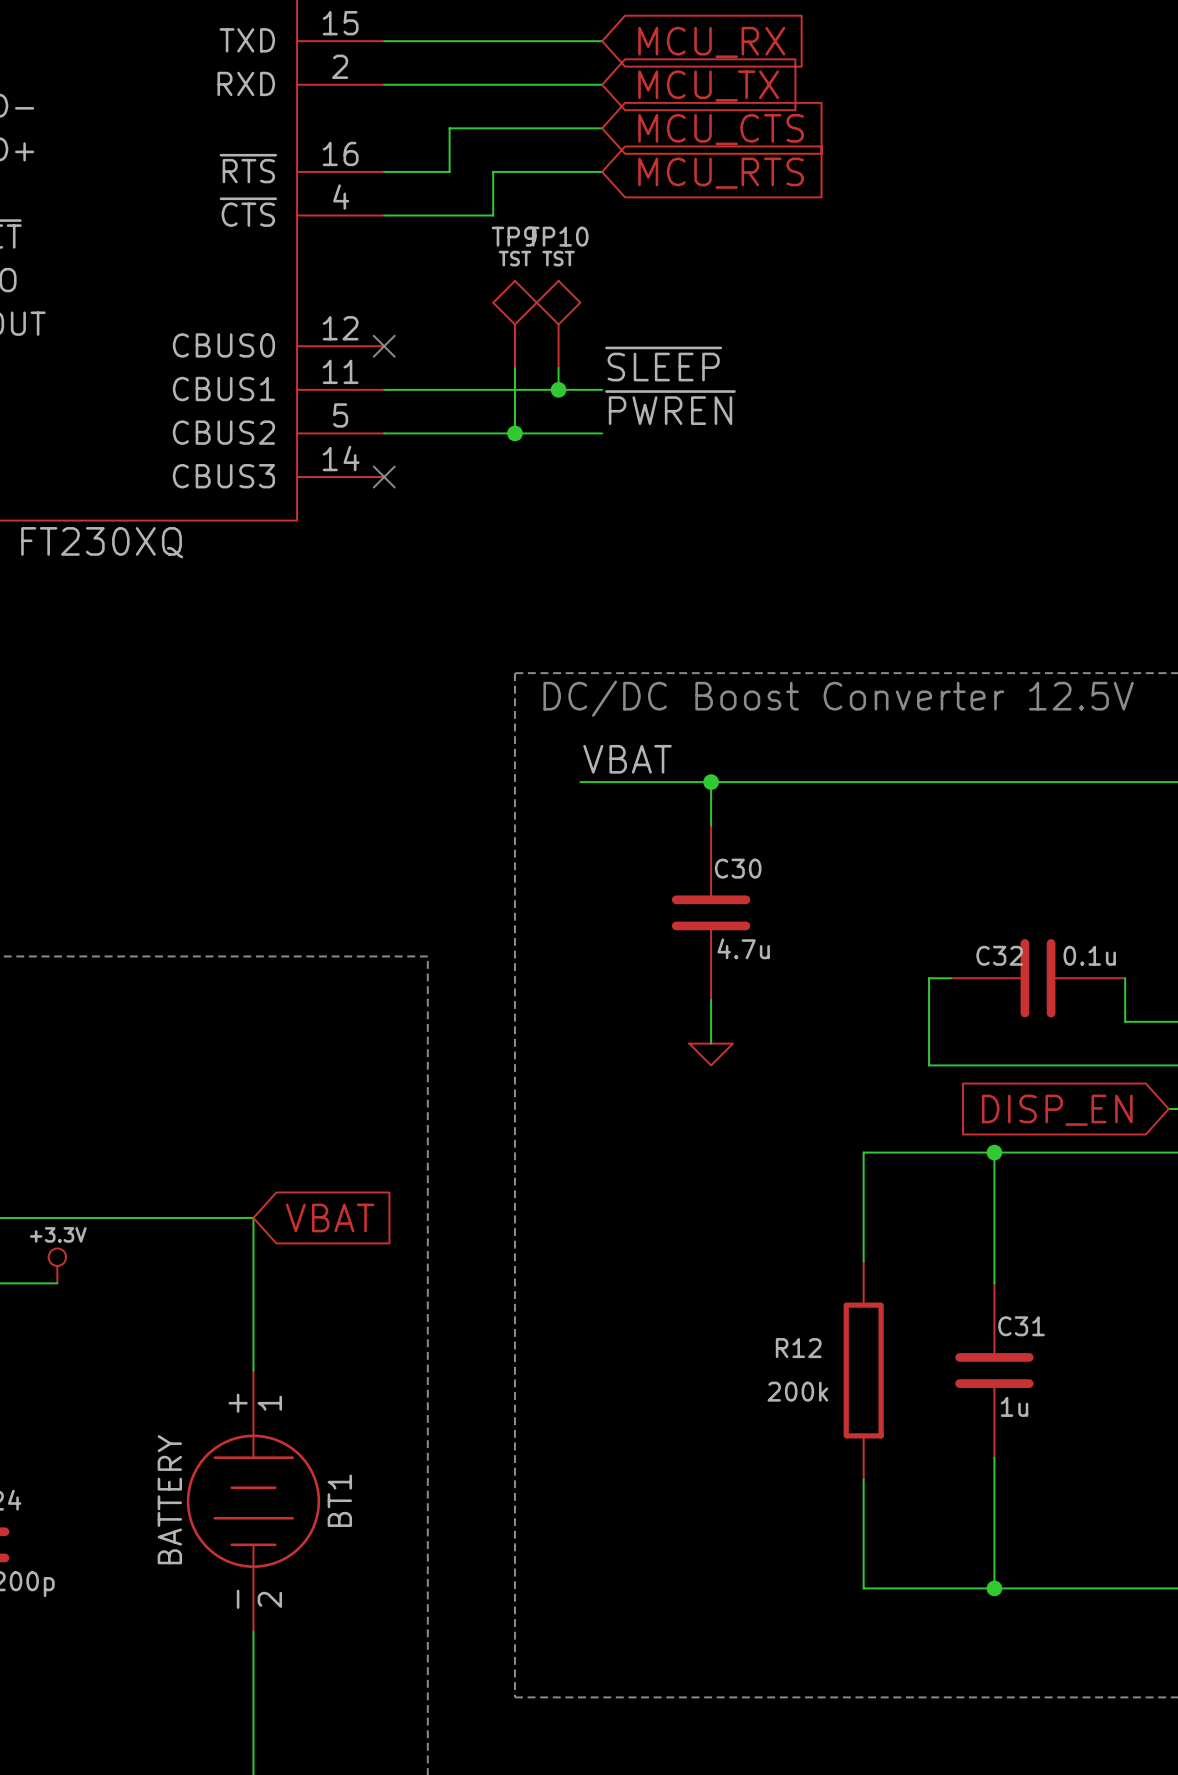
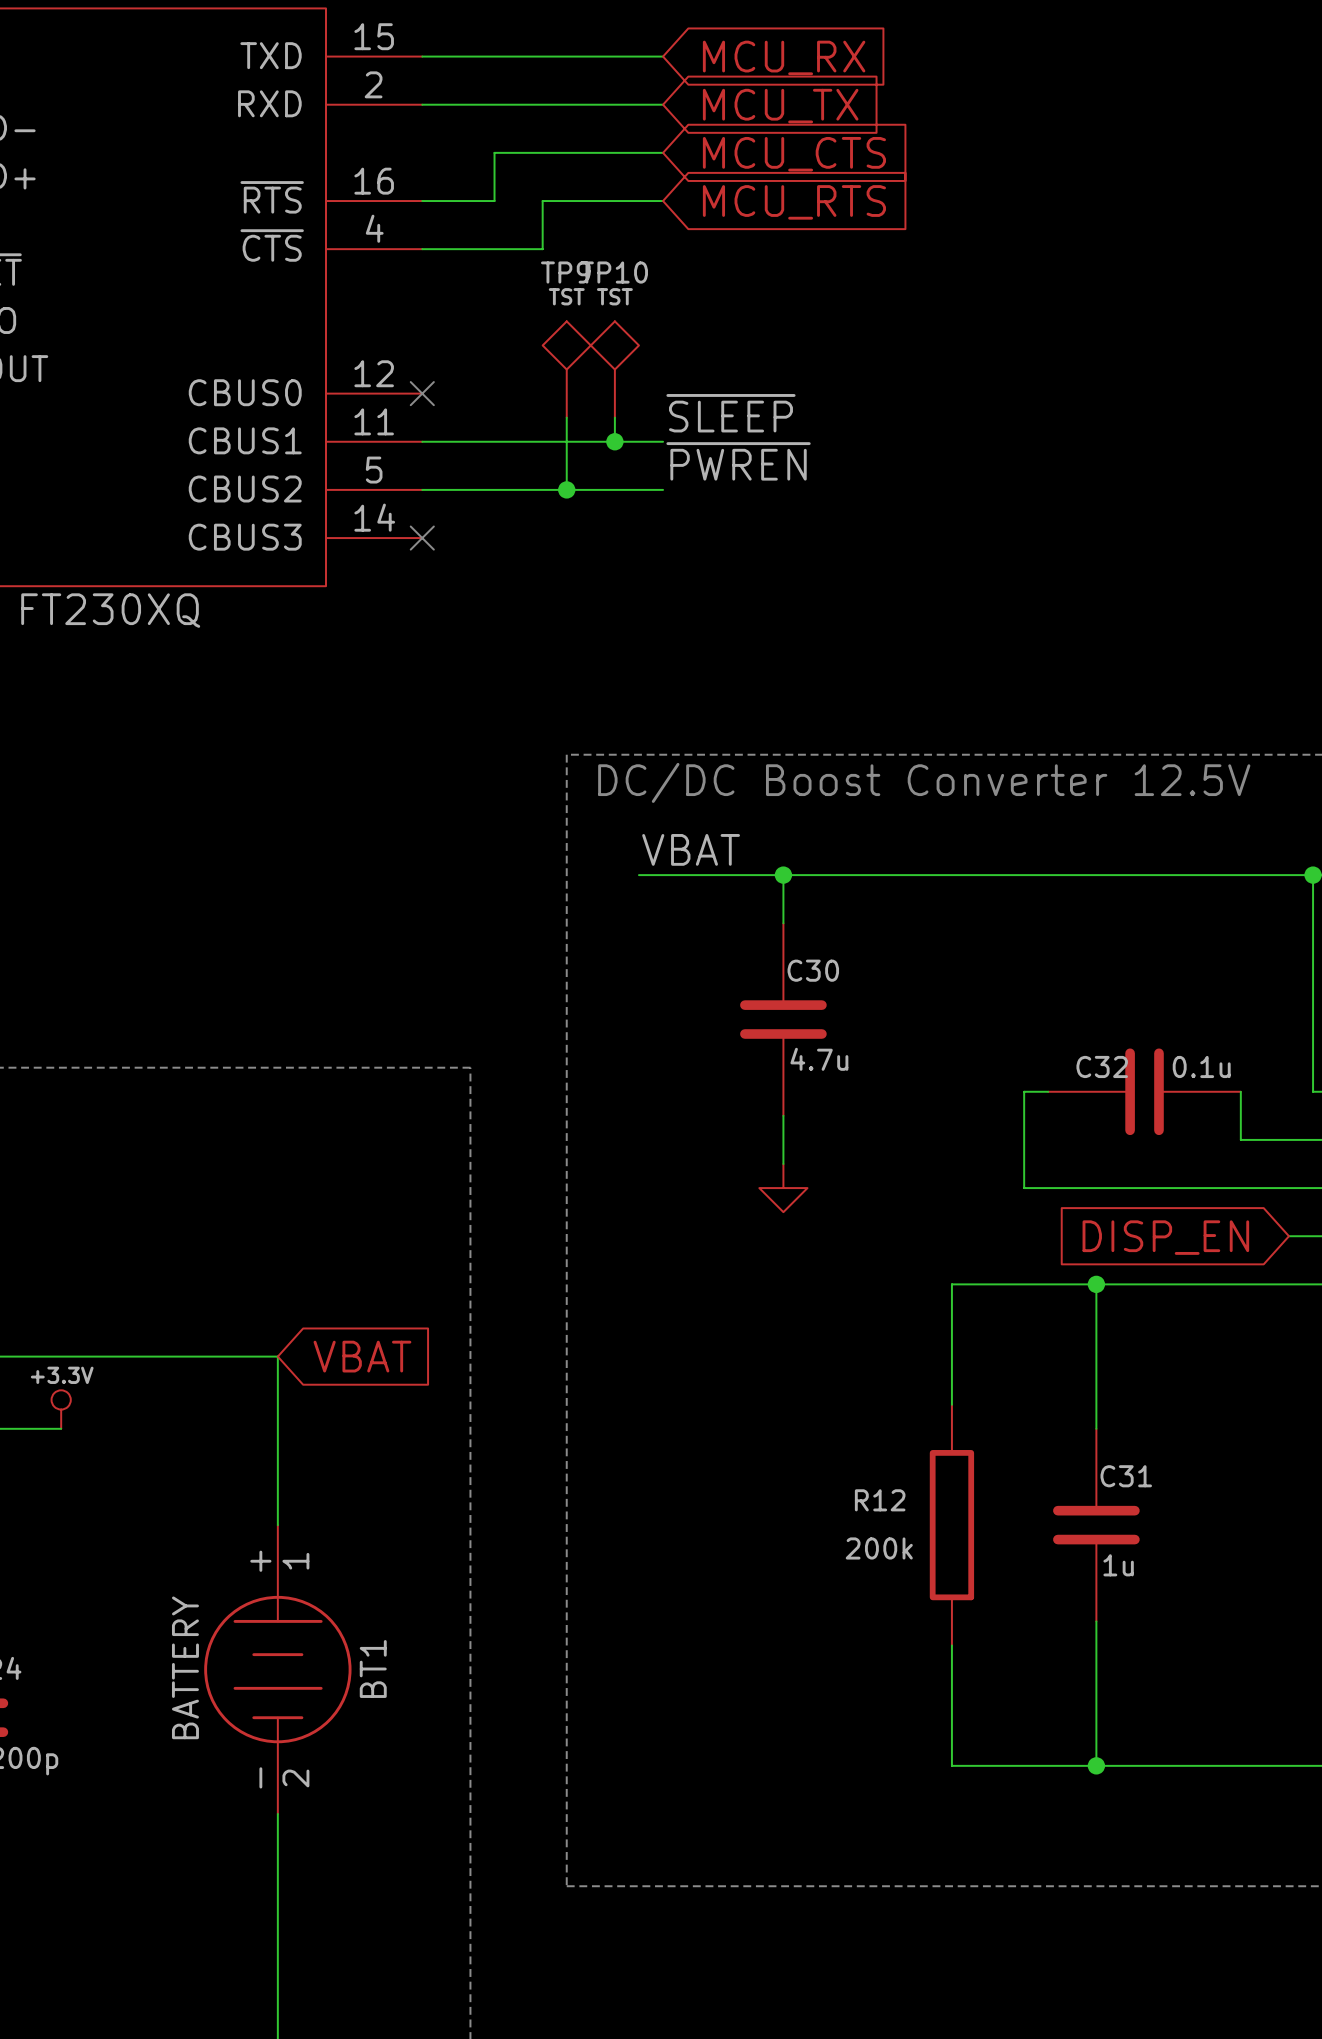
power symbol shape: [689, 1043, 733, 1066] -> [759, 1164, 808, 1213]

